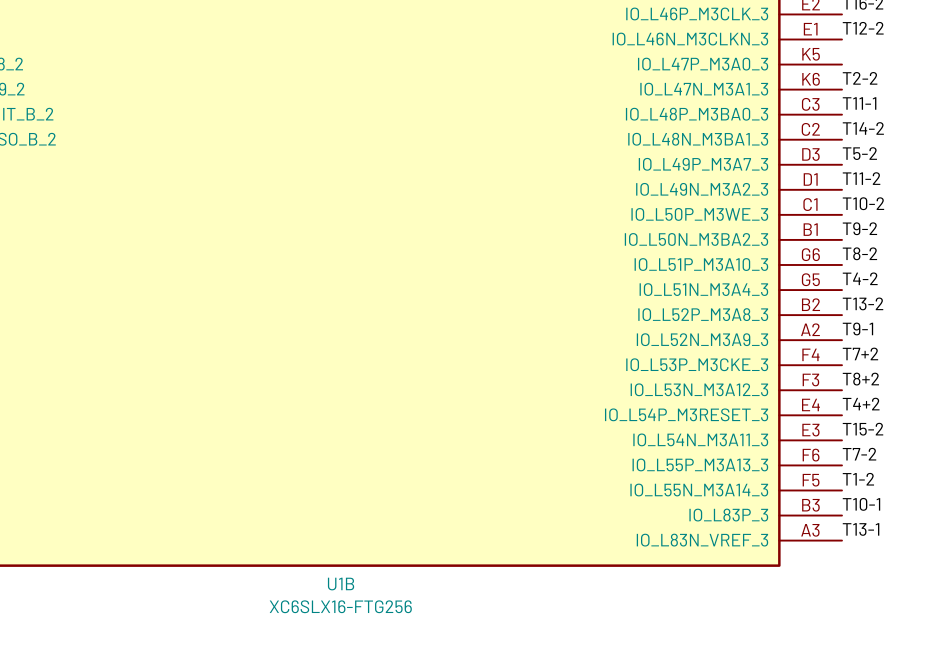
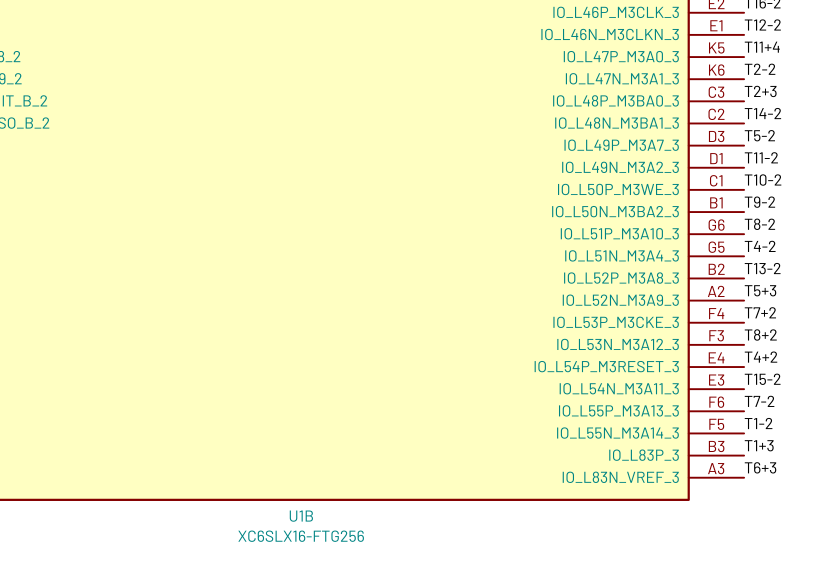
label: none -> T11+4 (762, 47)
label: T11-1 (859, 103) -> T2+3 (760, 91)
label: T9-1 (857, 328) -> T5+3 (760, 290)
label: T10-1 (861, 504) -> T1+3 (759, 445)
label: T13-1 (861, 529) -> T6+3 (760, 467)

